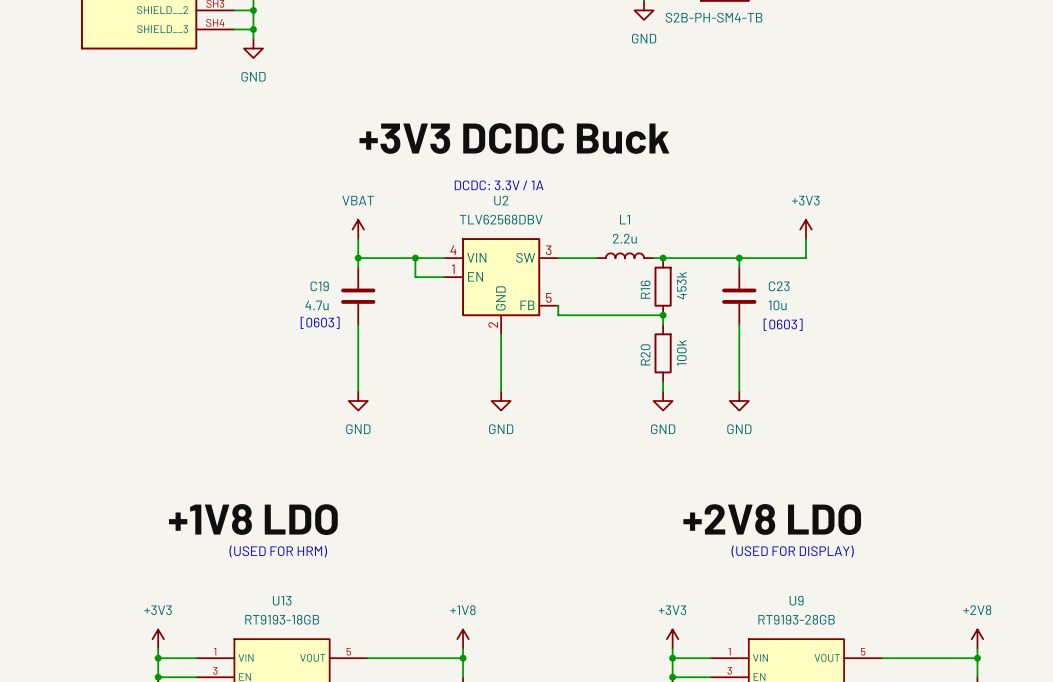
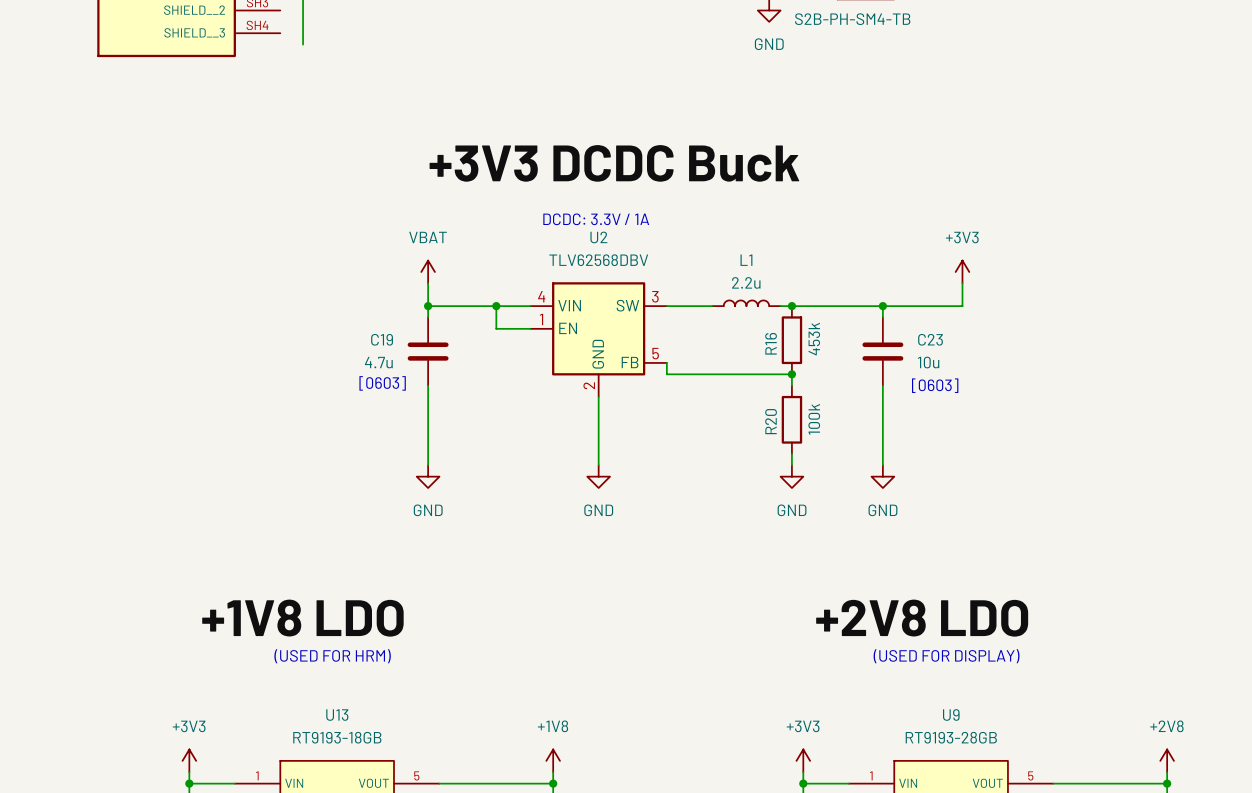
wire: (234, 10) (253, 10) -> none
junction: (253, 10) -> none
wire: (234, 29) (253, 29) -> none
junction: (253, 29) -> none
power symbol: GND (253, 48) -> none

